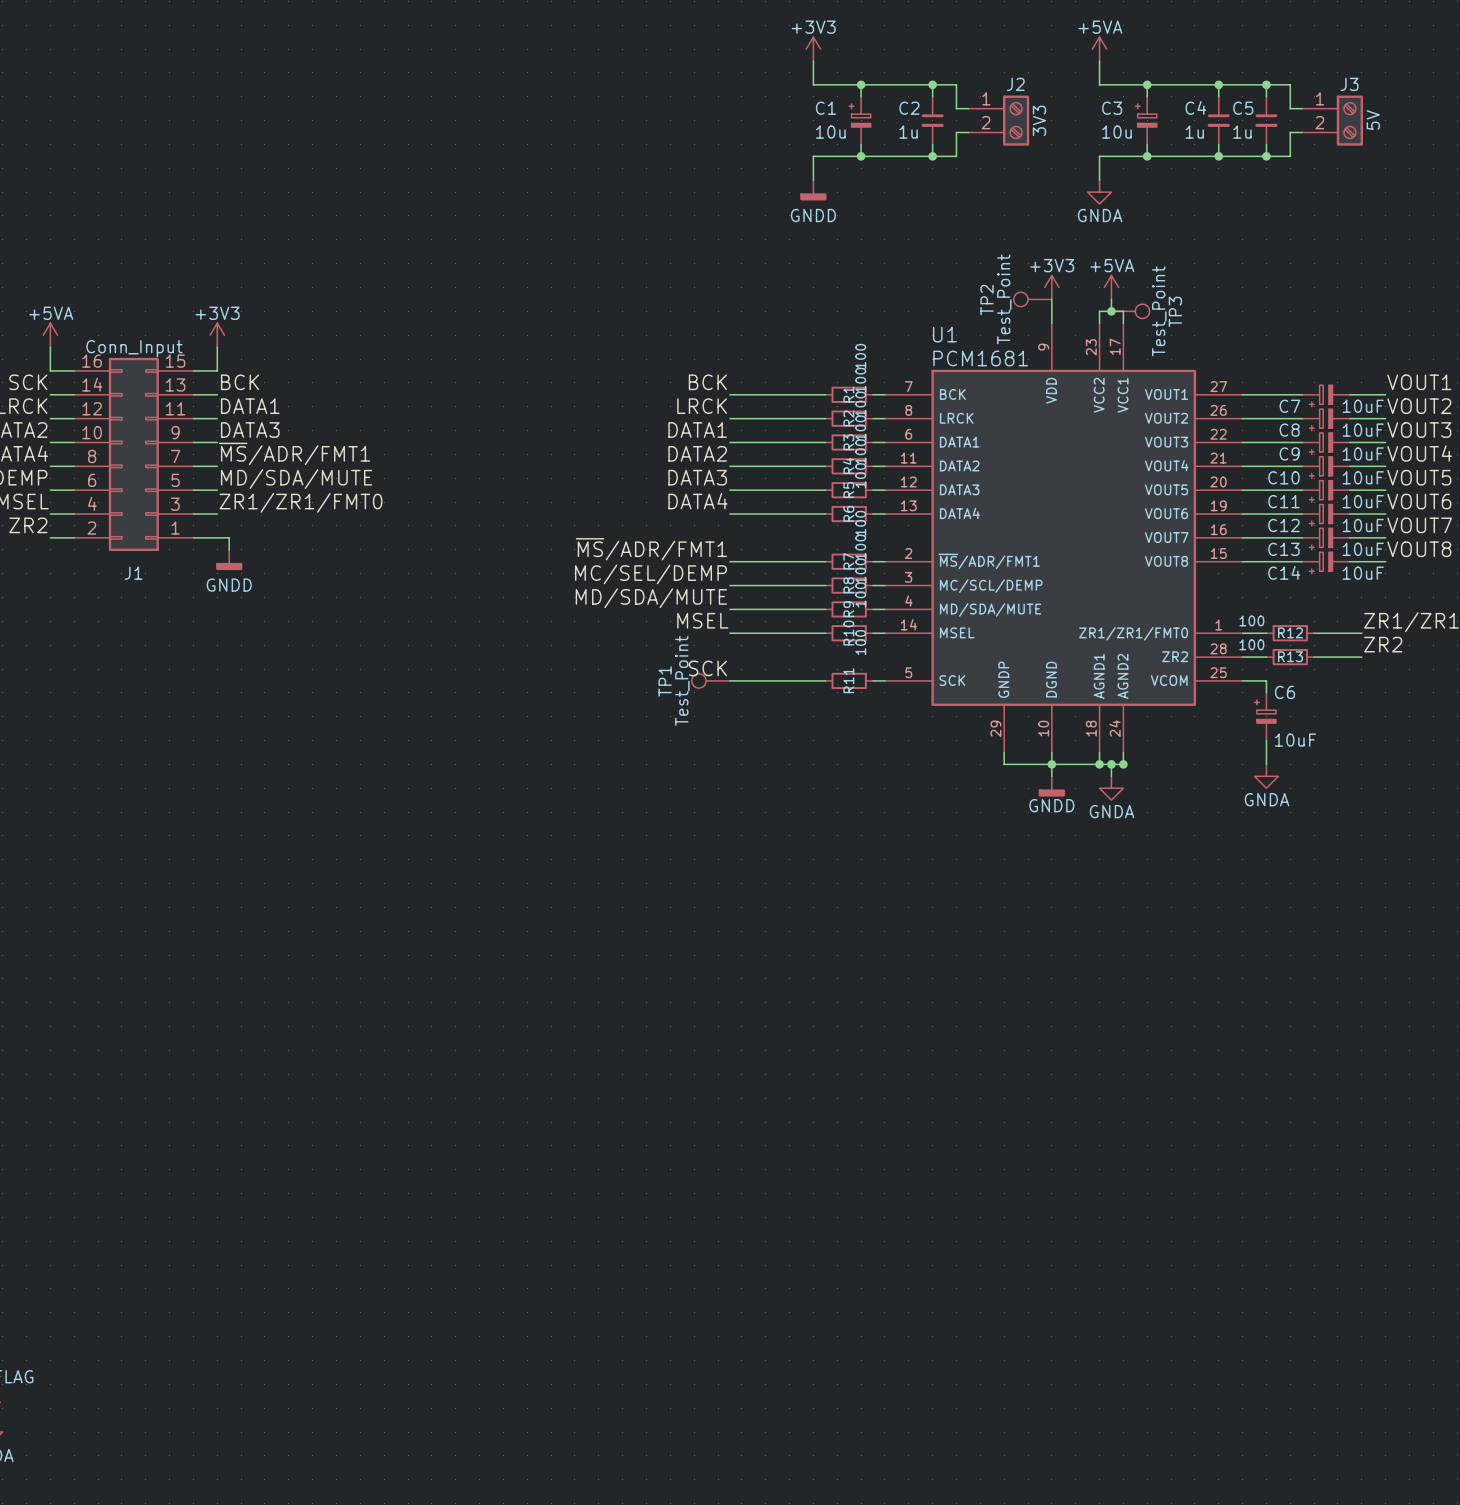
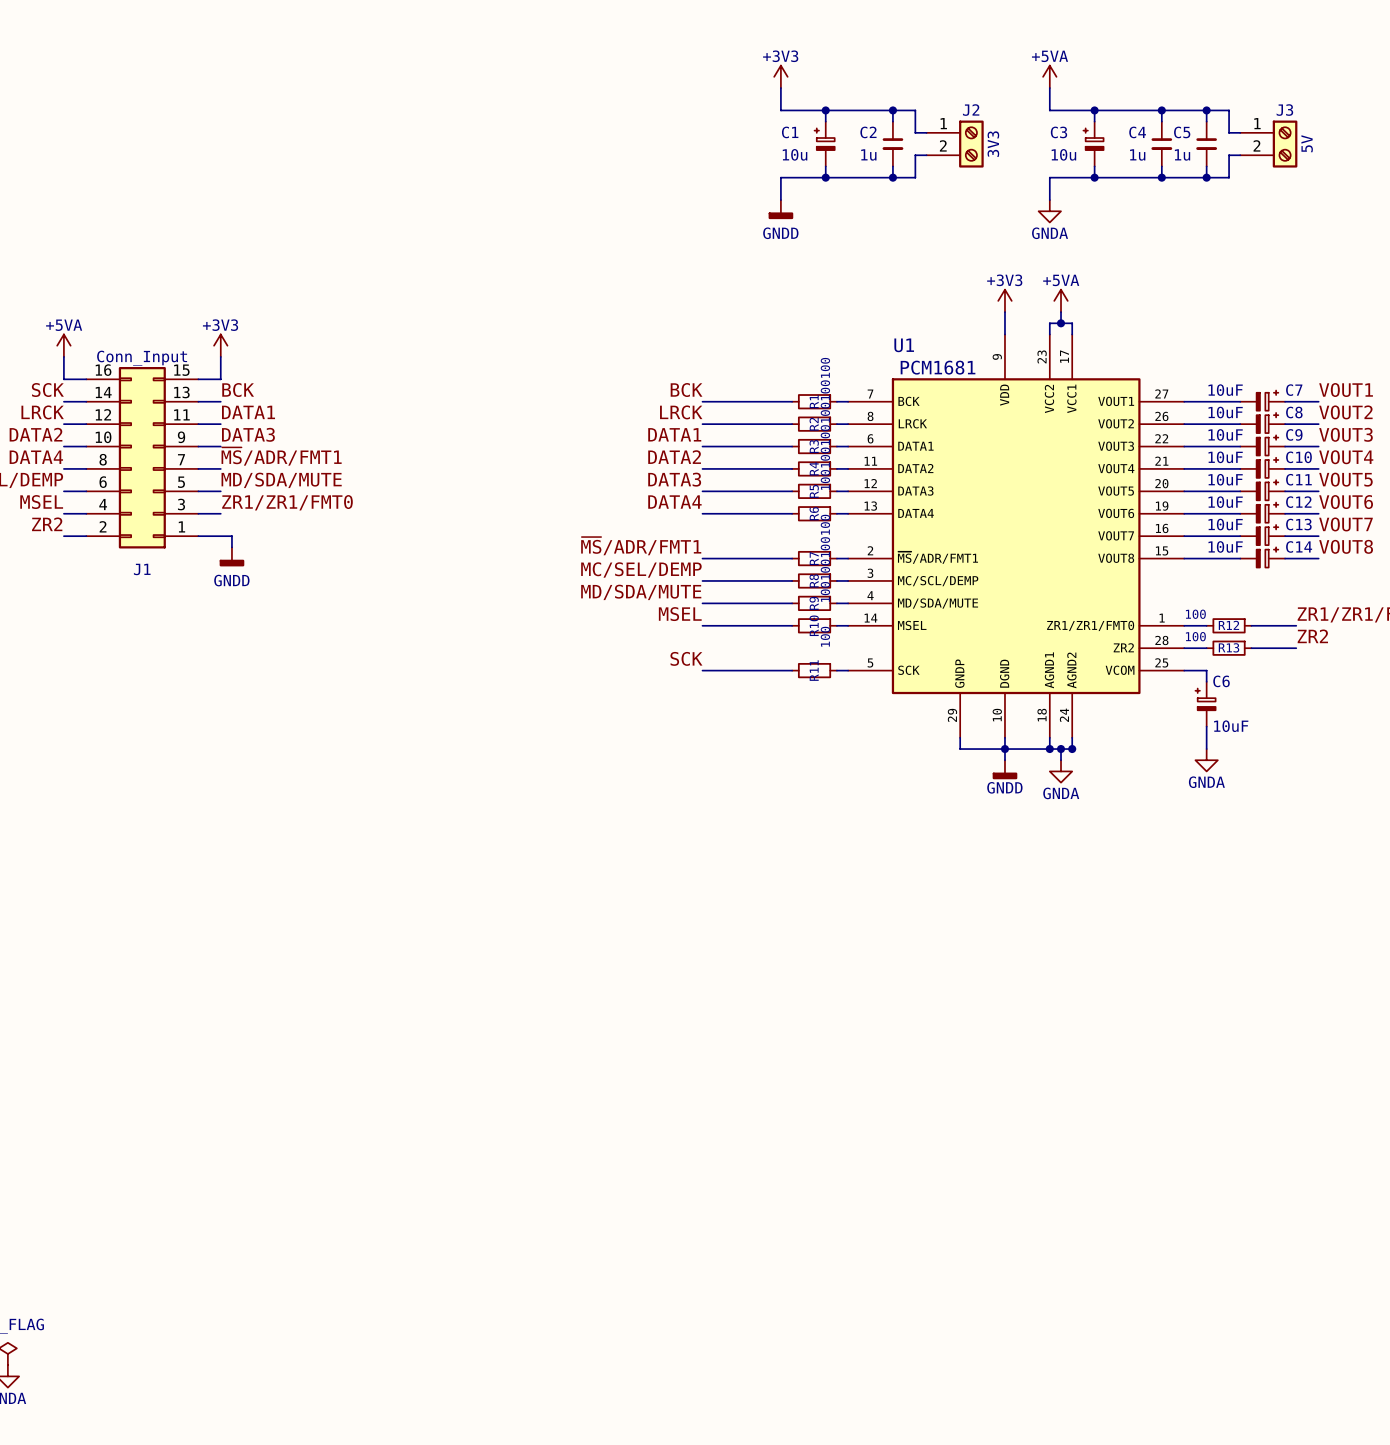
TP2: Test_Point (1032, 299) -> none
TP3: Test_Point (1130, 311) -> none
C7 rotation: 0° (1320, 395) -> 180° (1267, 400)
C8 rotation: 0° (1320, 419) -> 180° (1267, 423)
C9 rotation: 0° (1320, 443) -> 180° (1267, 445)
C10 rotation: 0° (1320, 467) -> 180° (1267, 467)
C11 rotation: 0° (1320, 491) -> 180° (1267, 490)
C12 rotation: 0° (1320, 515) -> 180° (1267, 512)
C13 rotation: 0° (1320, 539) -> 180° (1267, 535)
C14 rotation: 0° (1320, 562) -> 180° (1267, 557)
TP1: Test_Point (710, 680) -> none

